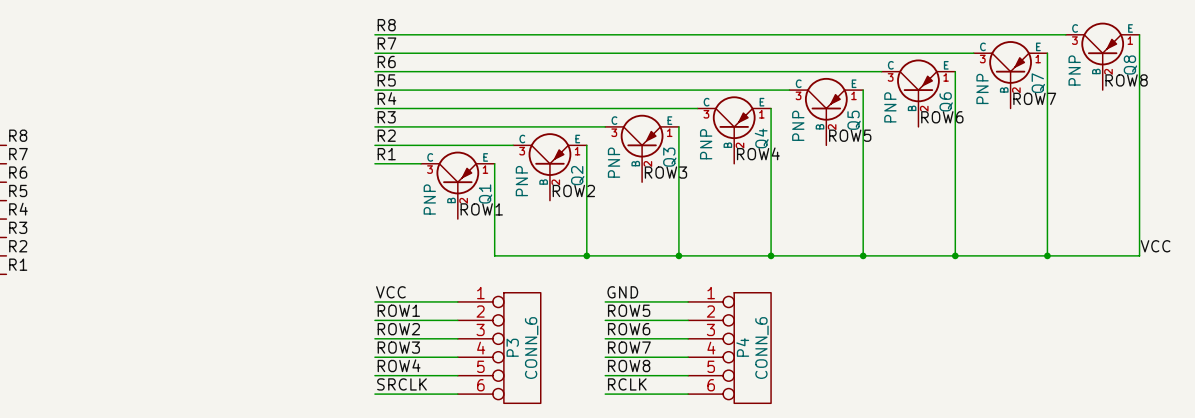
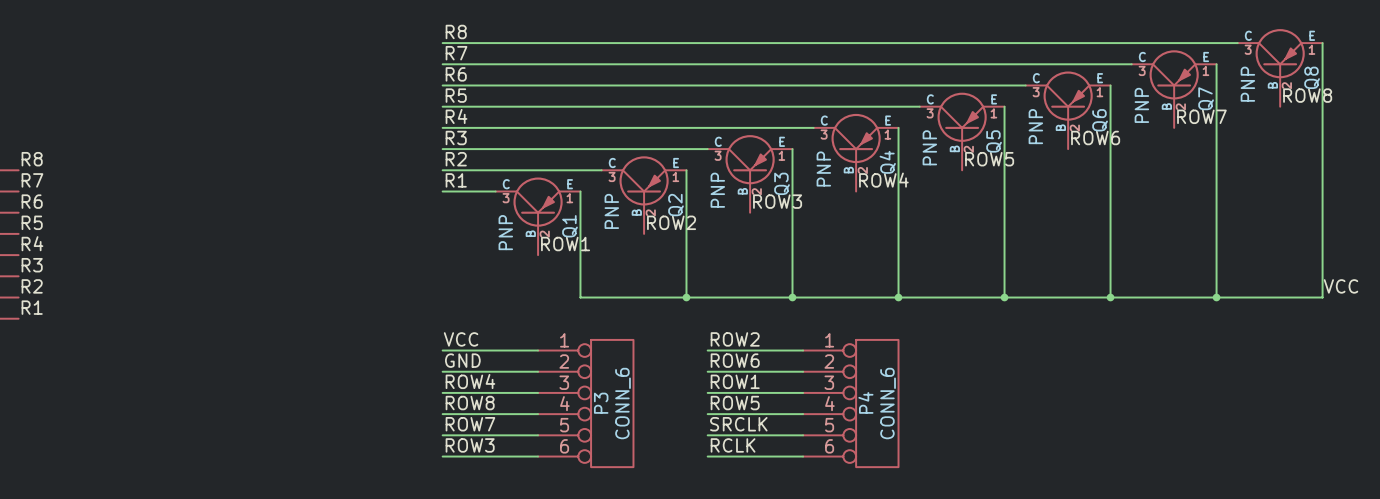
label: GND (622, 292) -> ROW2 (735, 339)
label: ROW1 (398, 310) -> GND (462, 360)
label: ROW5 (629, 310) -> ROW6 (735, 360)
label: ROW2 (398, 329) -> ROW4 (470, 381)
label: ROW6 (629, 329) -> ROW1 (735, 381)
label: ROW3 (398, 347) -> ROW8 (470, 403)
label: ROW7 (629, 347) -> ROW5 (735, 403)
label: ROW4 (399, 365) -> ROW7 (470, 424)
label: ROW8 (629, 366) -> SRCLK (738, 424)
label: SRCLK (401, 384) -> ROW3 (470, 445)

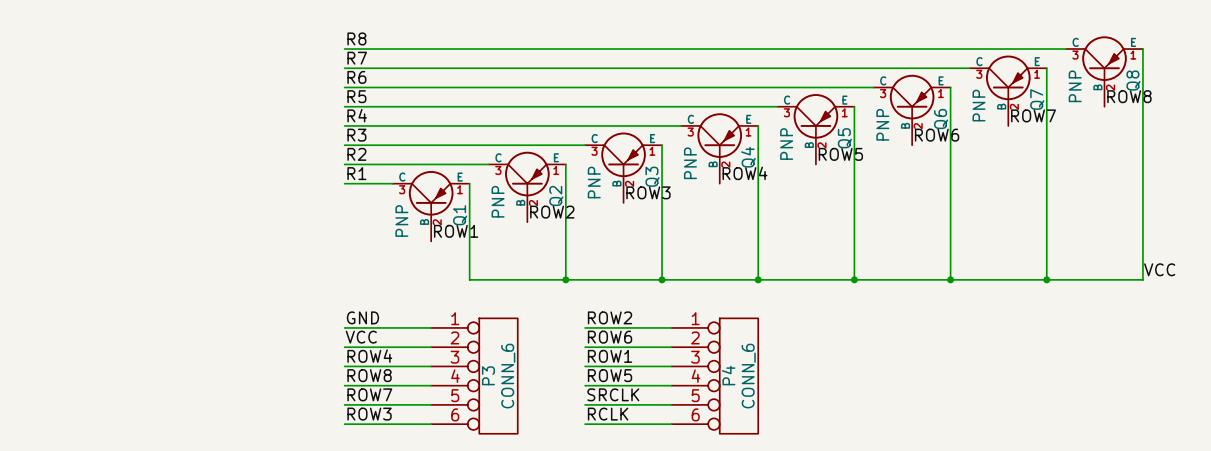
label: VCC (461, 339) -> GND (362, 317)
label: GND (462, 360) -> VCC (361, 337)

